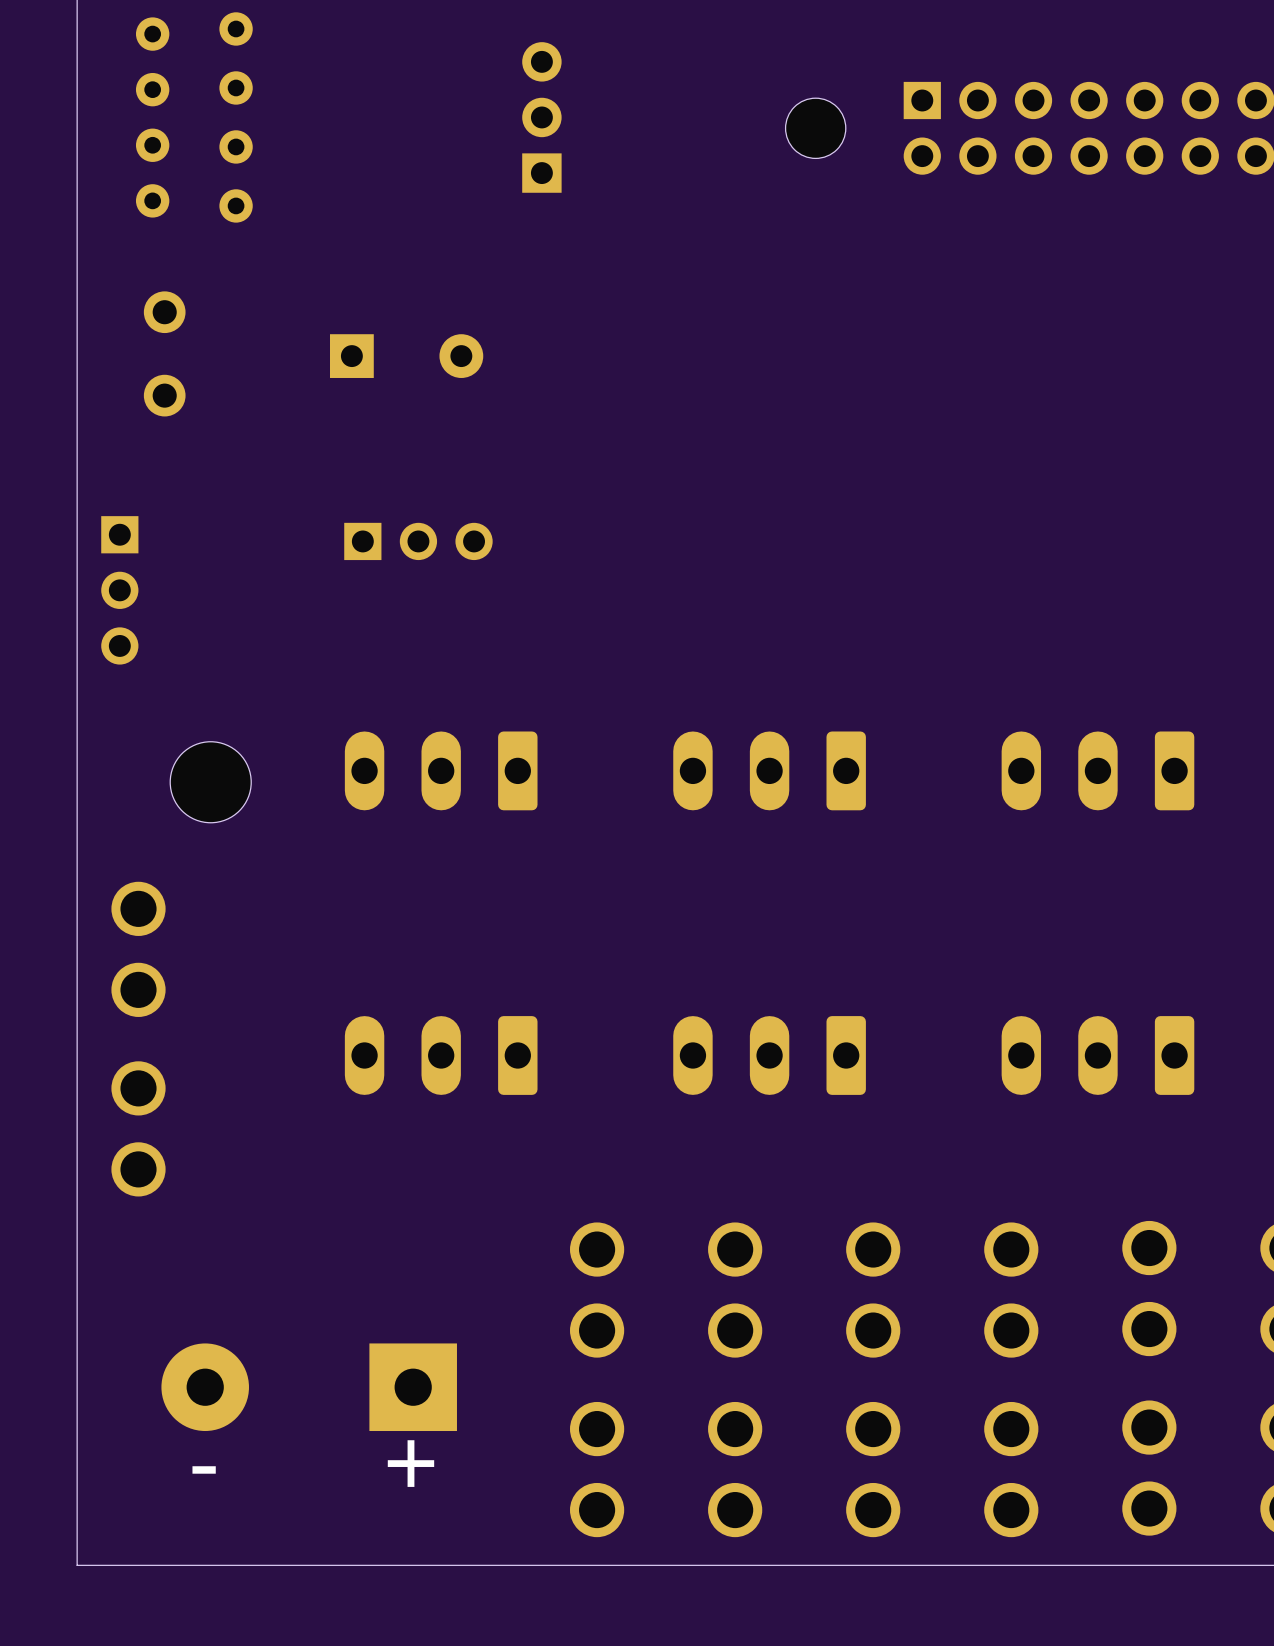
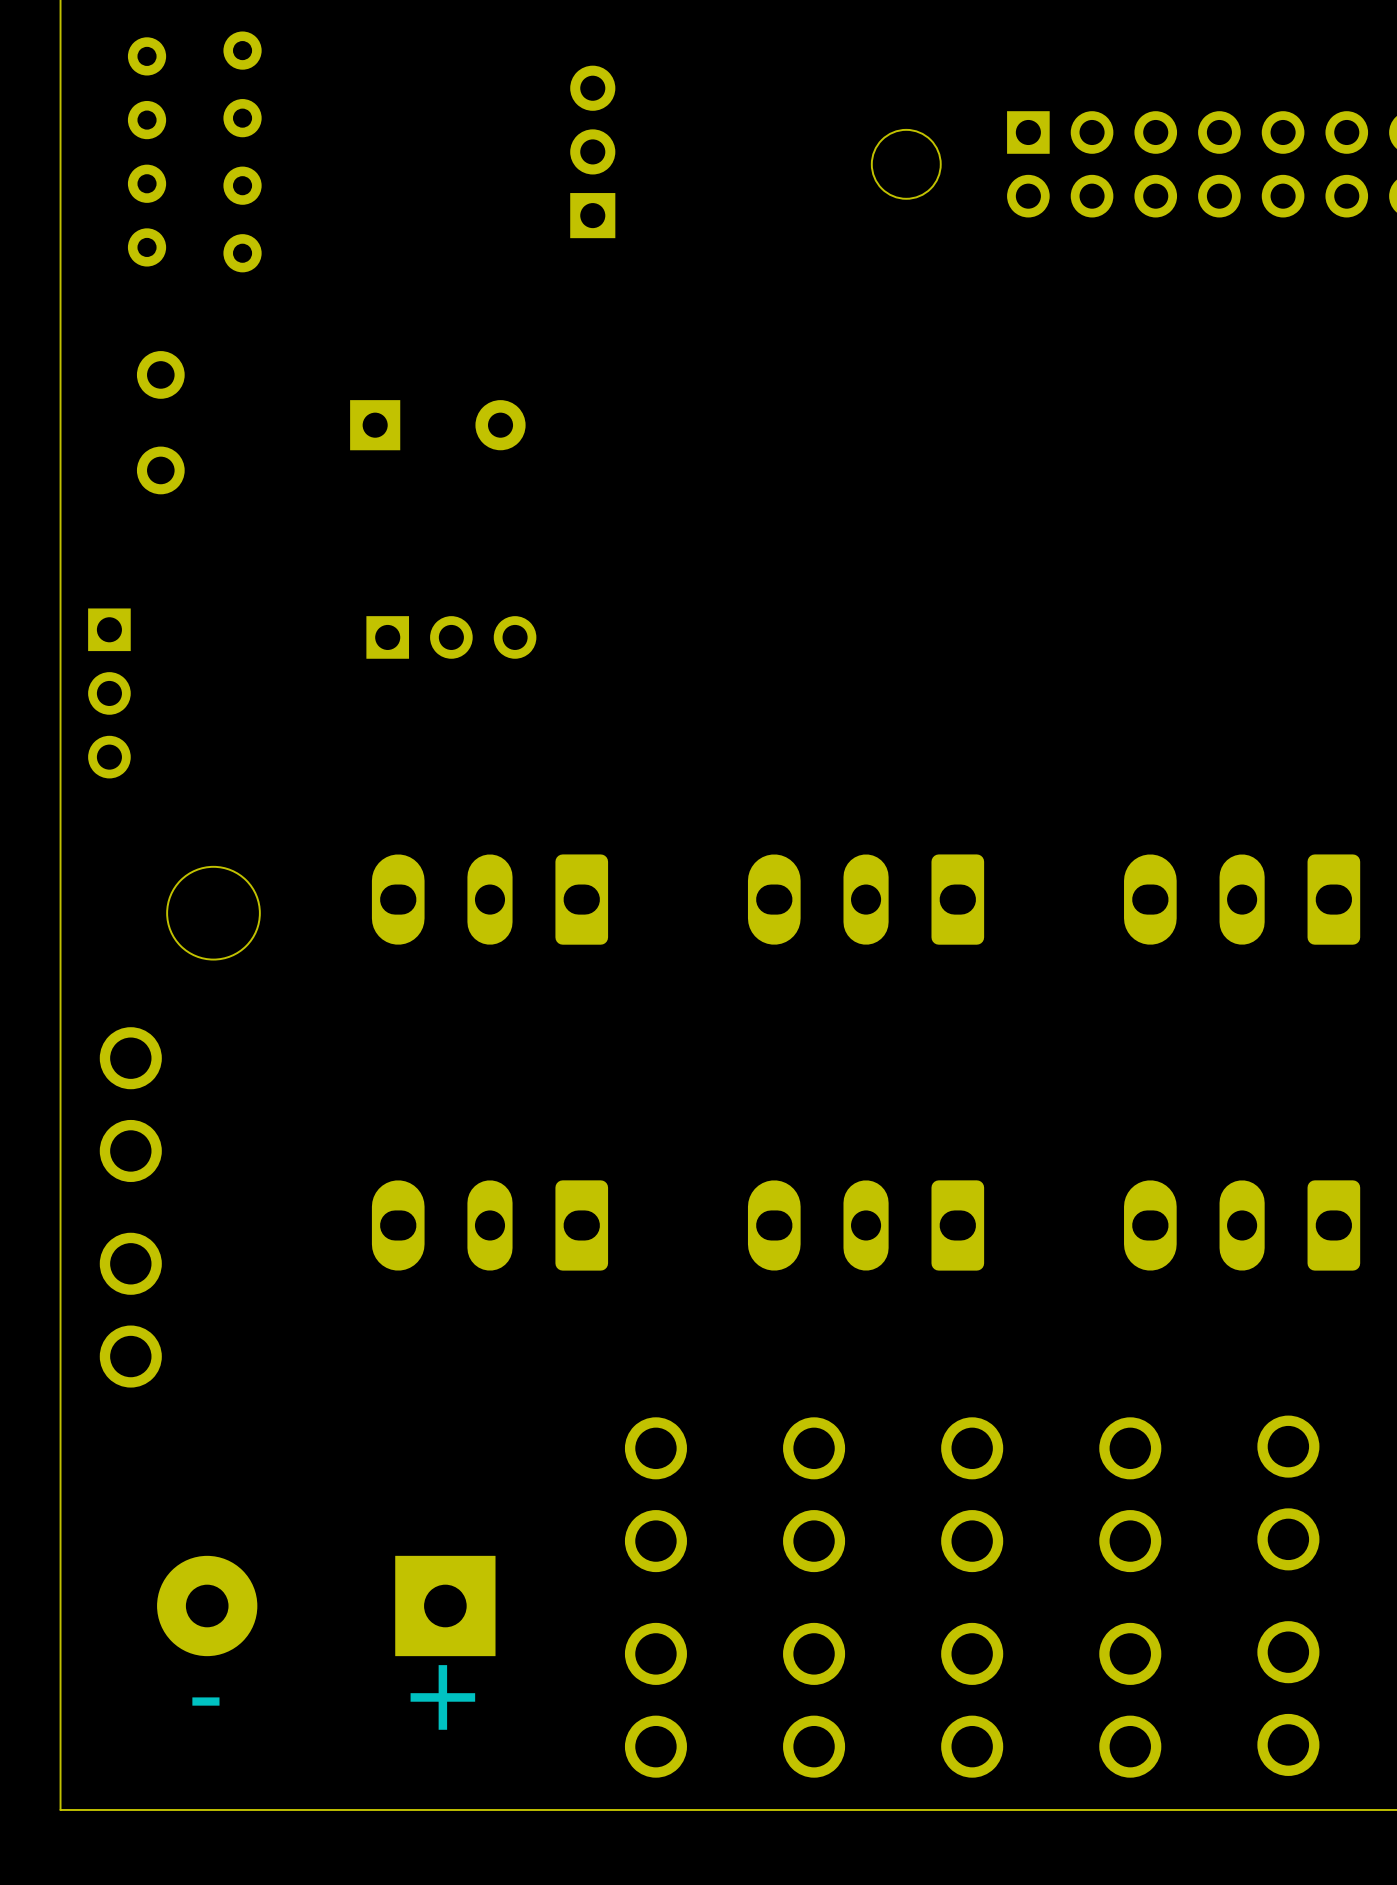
part footprint: [344, 731, 538, 811] -> [371, 854, 609, 945]
part footprint: [673, 731, 866, 811] -> [747, 854, 985, 945]
part footprint: [1001, 731, 1195, 811] -> [1124, 854, 1361, 945]
part footprint: [344, 1016, 538, 1095] -> [371, 1180, 609, 1271]
part footprint: [673, 1016, 866, 1095] -> [747, 1180, 985, 1271]
part footprint: [1001, 1016, 1195, 1095] -> [1124, 1180, 1361, 1271]

